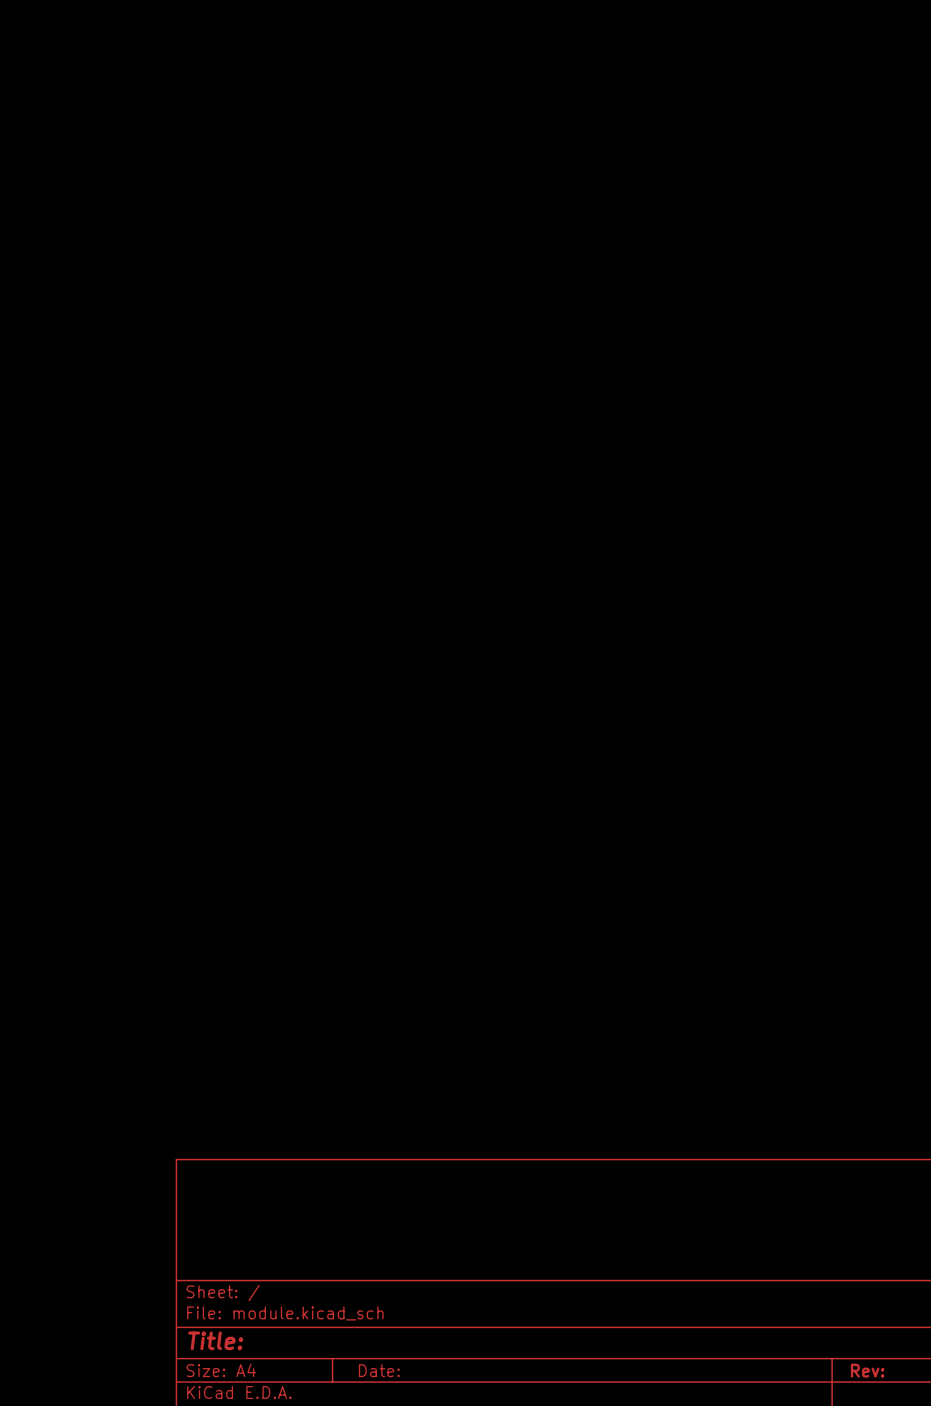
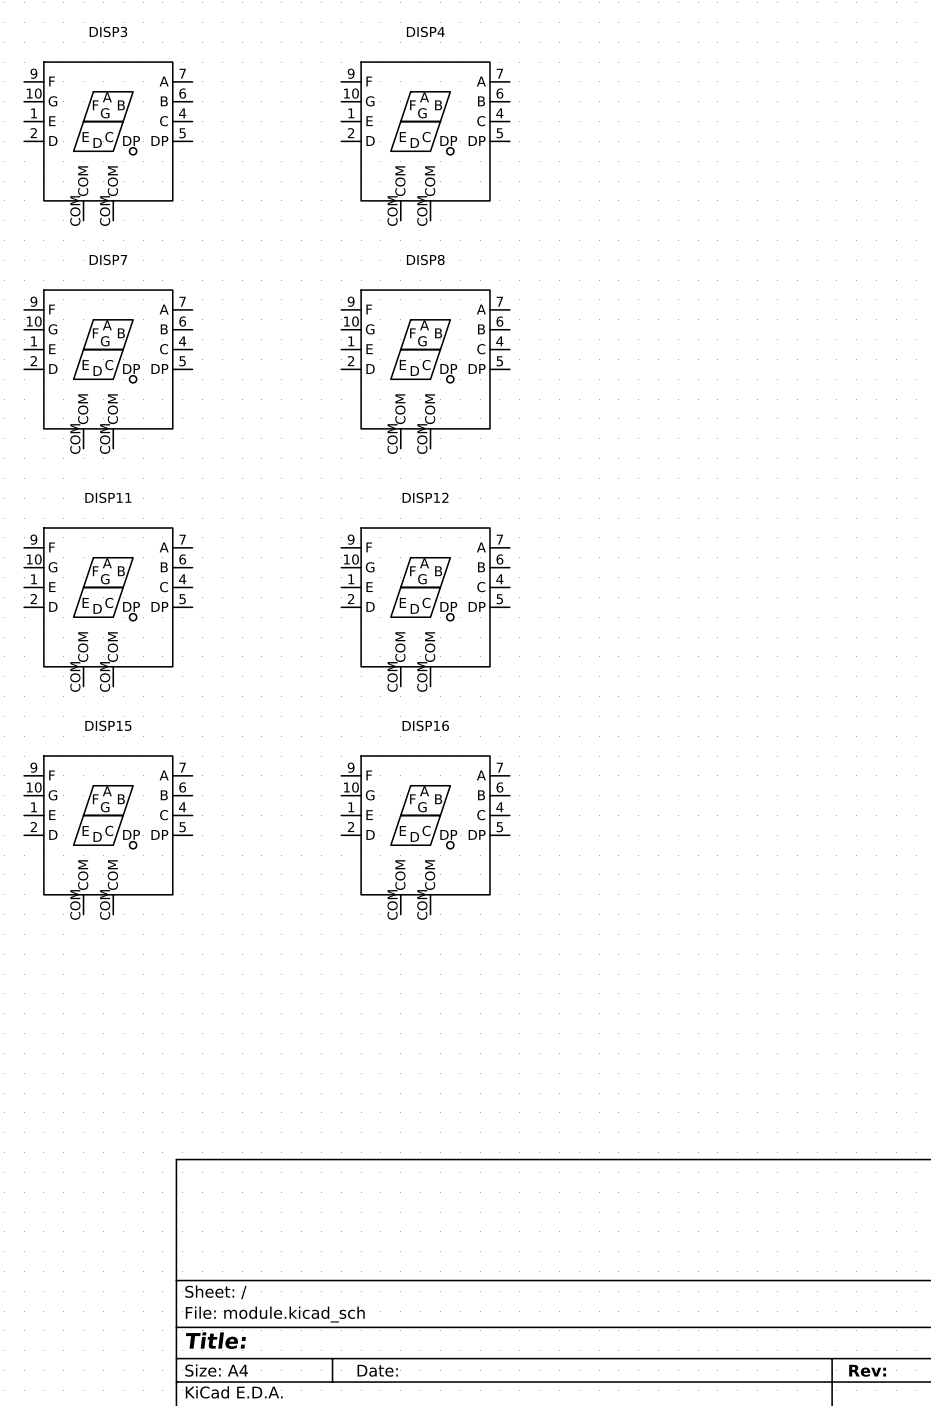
DISP3: none -> (108, 141)
DISP4: none -> (425, 141)
DISP7: none -> (108, 369)
DISP8: none -> (425, 369)
DISP11: none -> (108, 607)
DISP12: none -> (425, 607)
DISP15: none -> (108, 835)
DISP16: none -> (425, 835)

